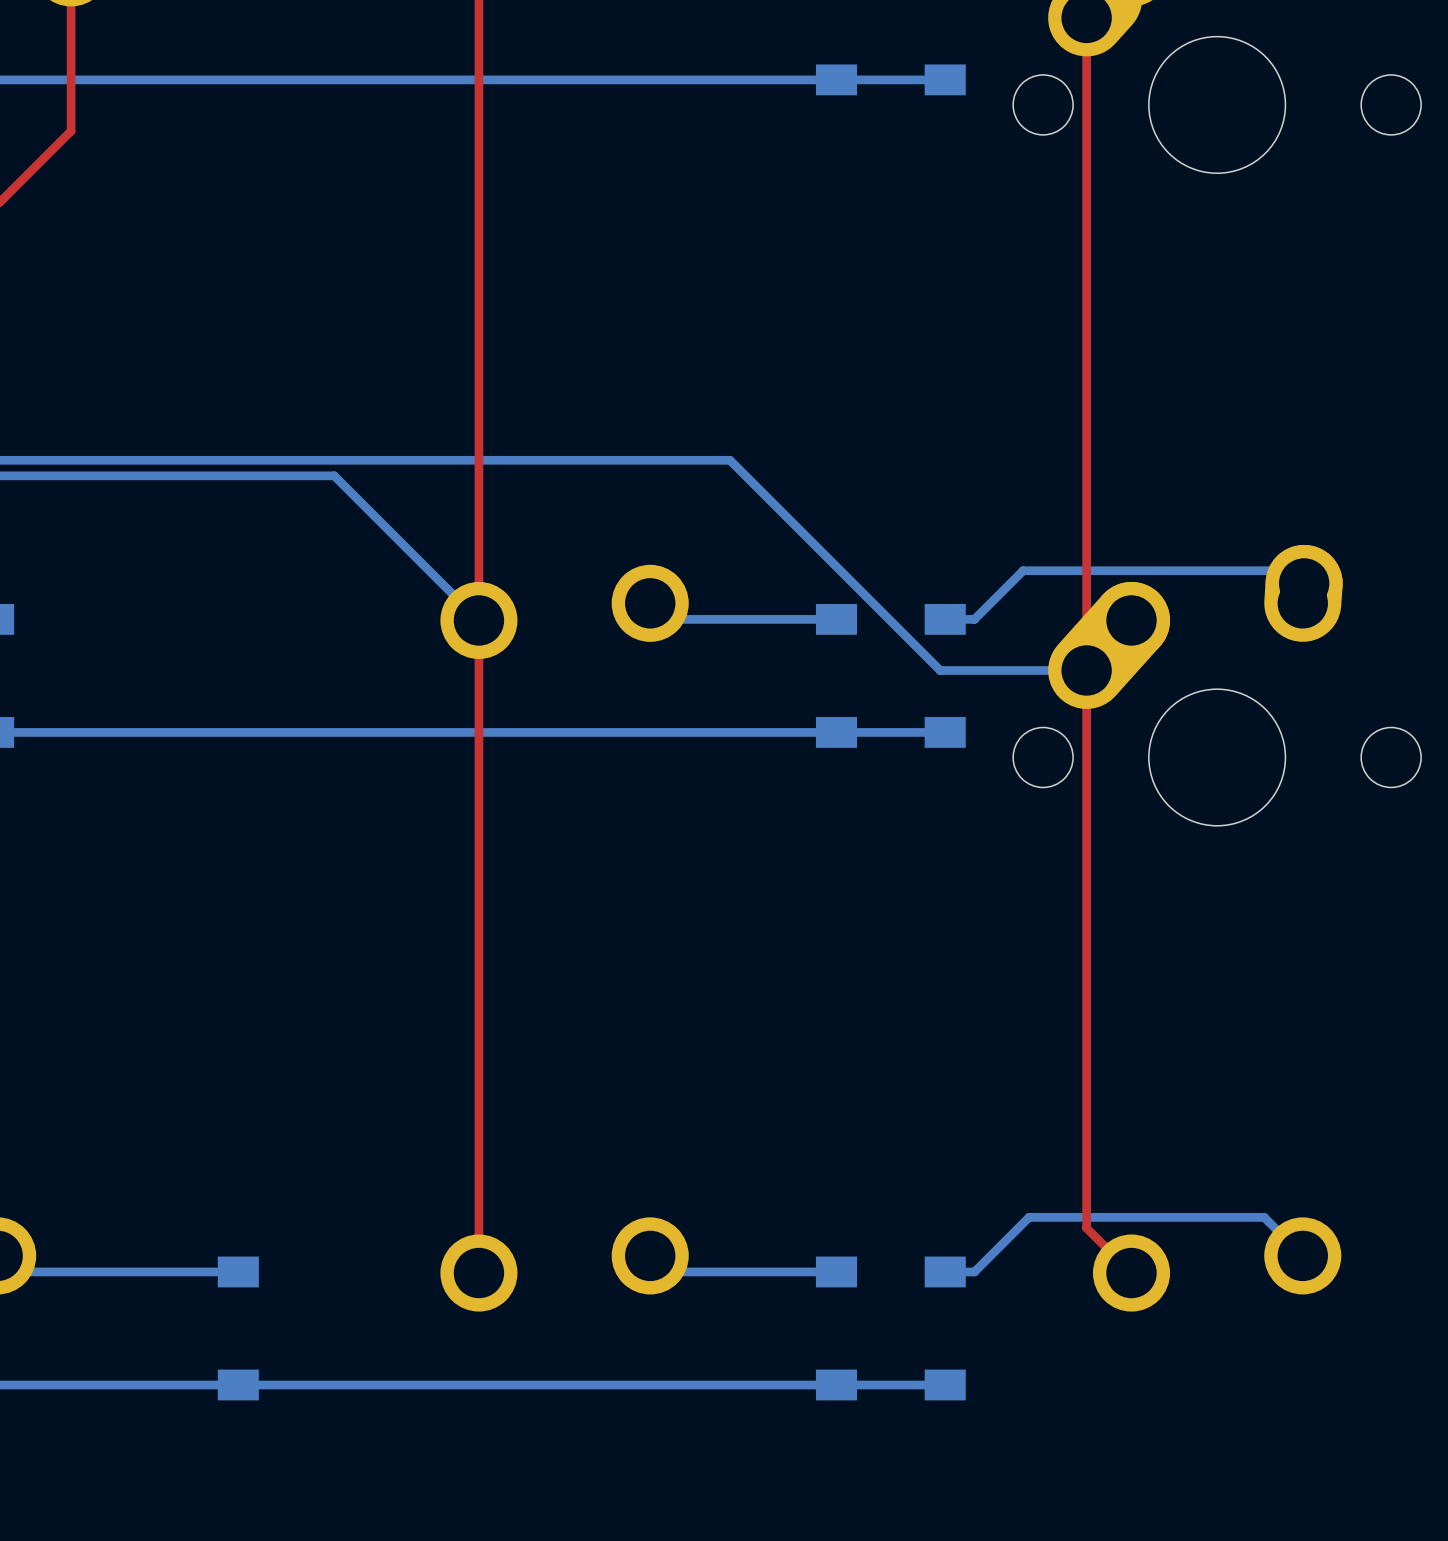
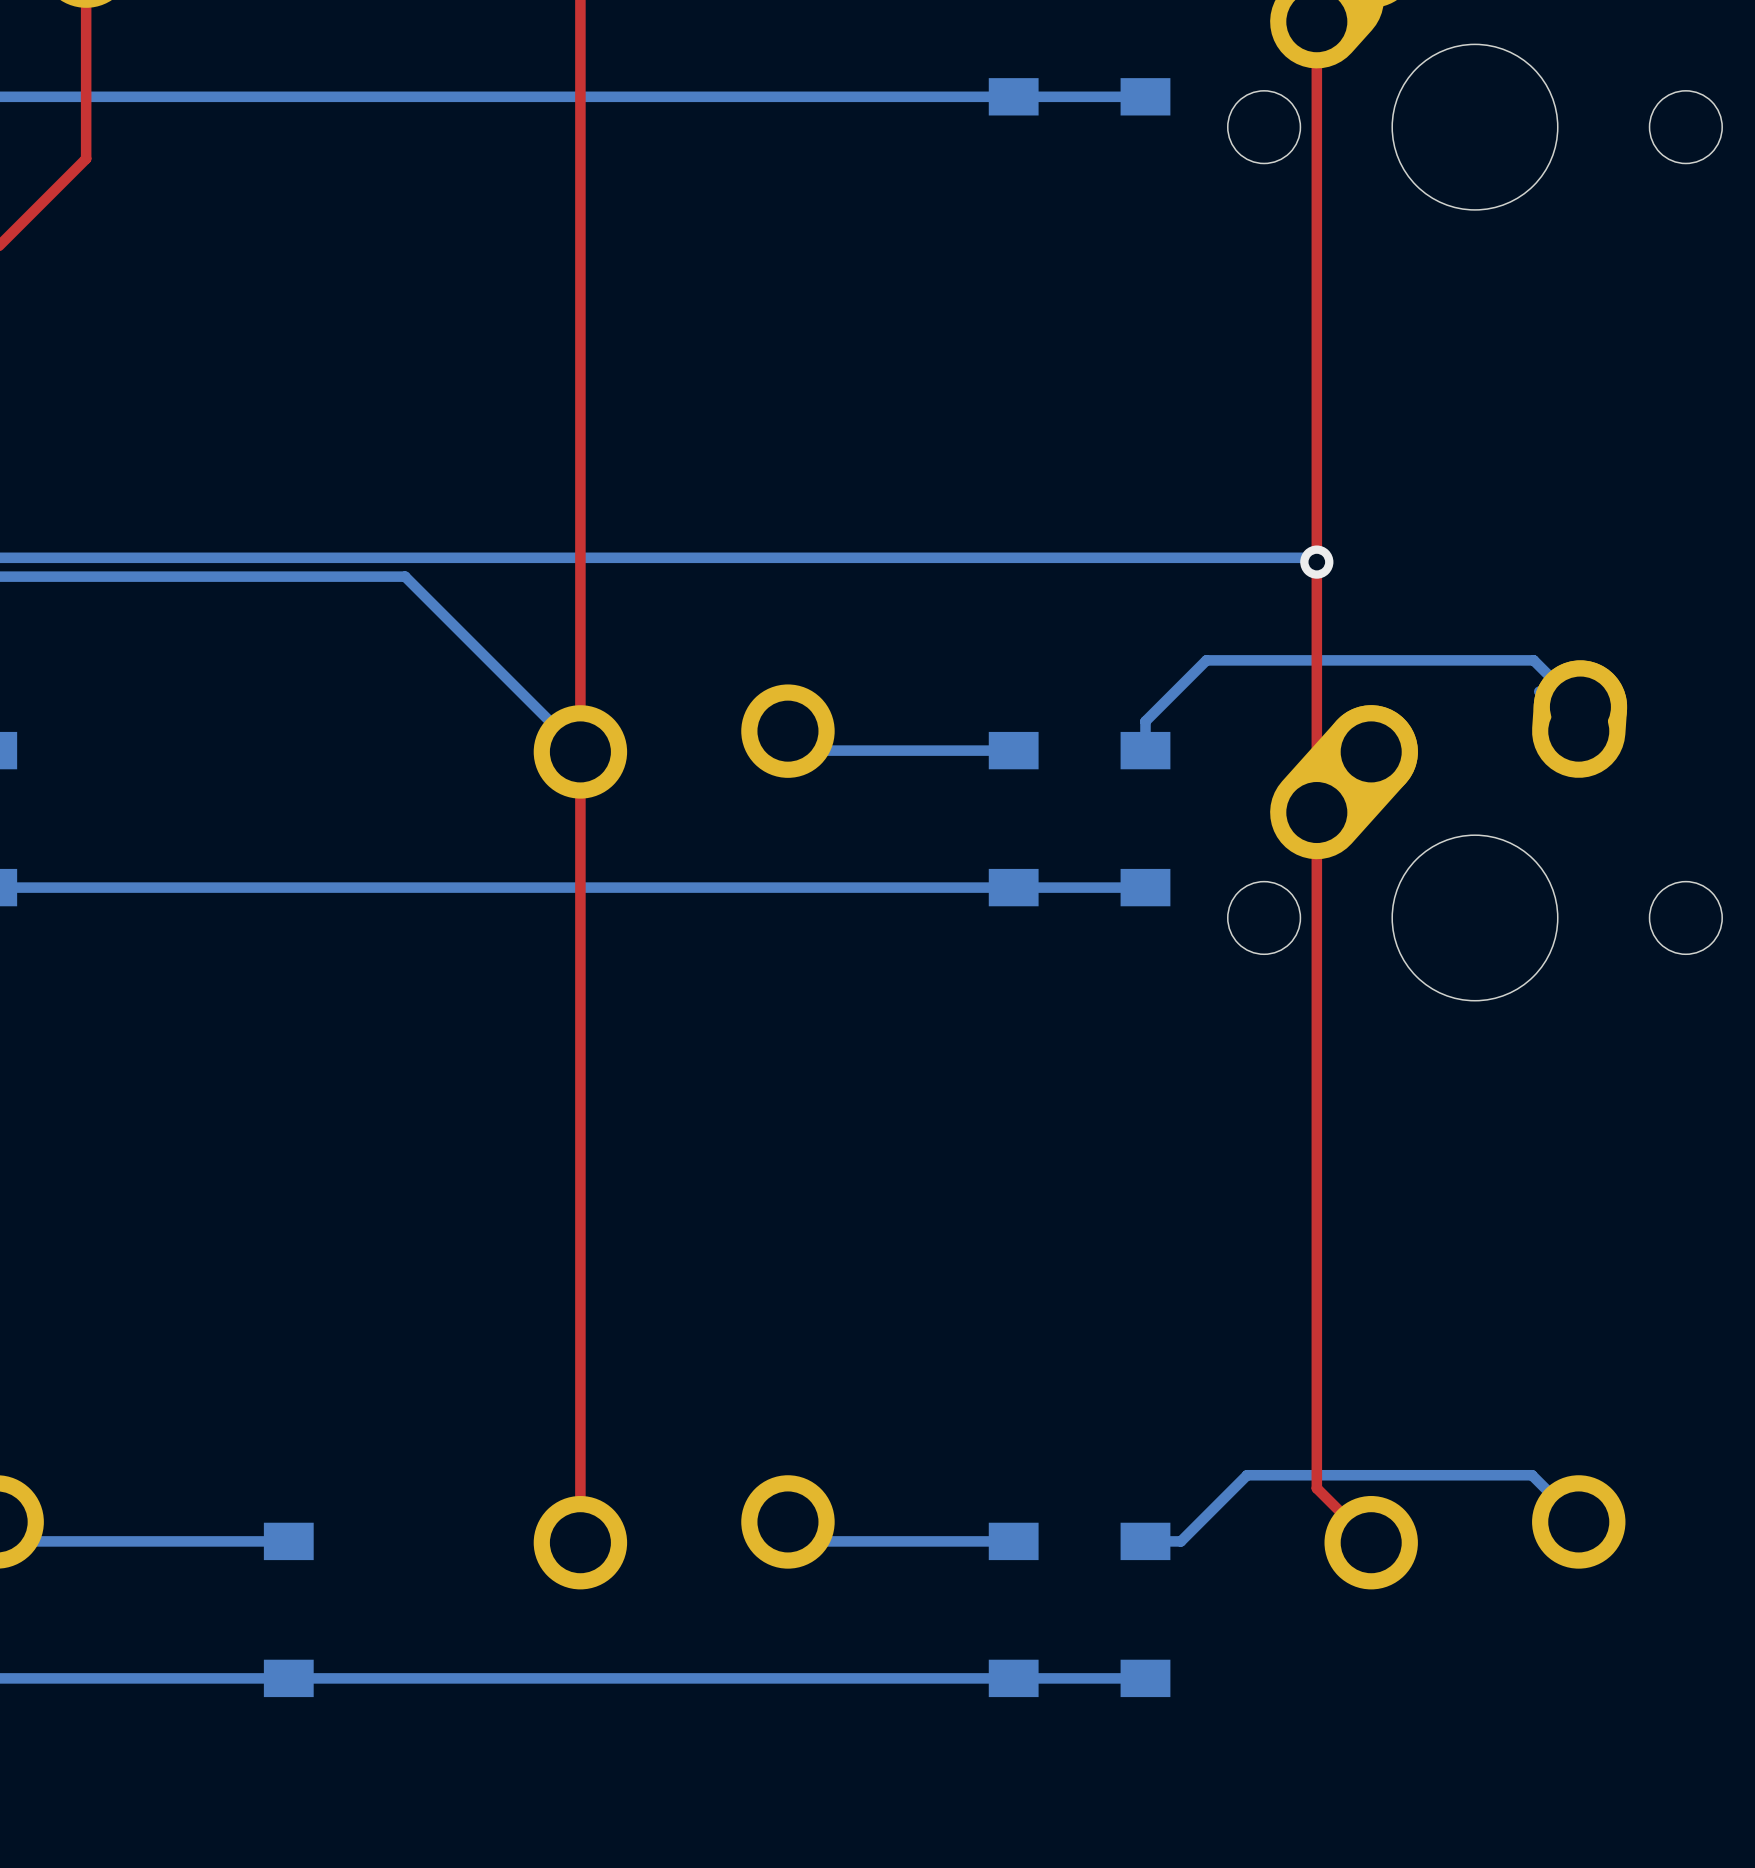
bottom track: (730, 460) (940, 670) (1086, 670) -> (884, 557) (1312, 557) (1316, 562)
via: none -> (1316, 562)
bottom track: (1270, 570) (1023, 570) (974, 619) (945, 619) -> (1580, 707) (1533, 660) (1206, 660) (1145, 721) (1145, 750)

